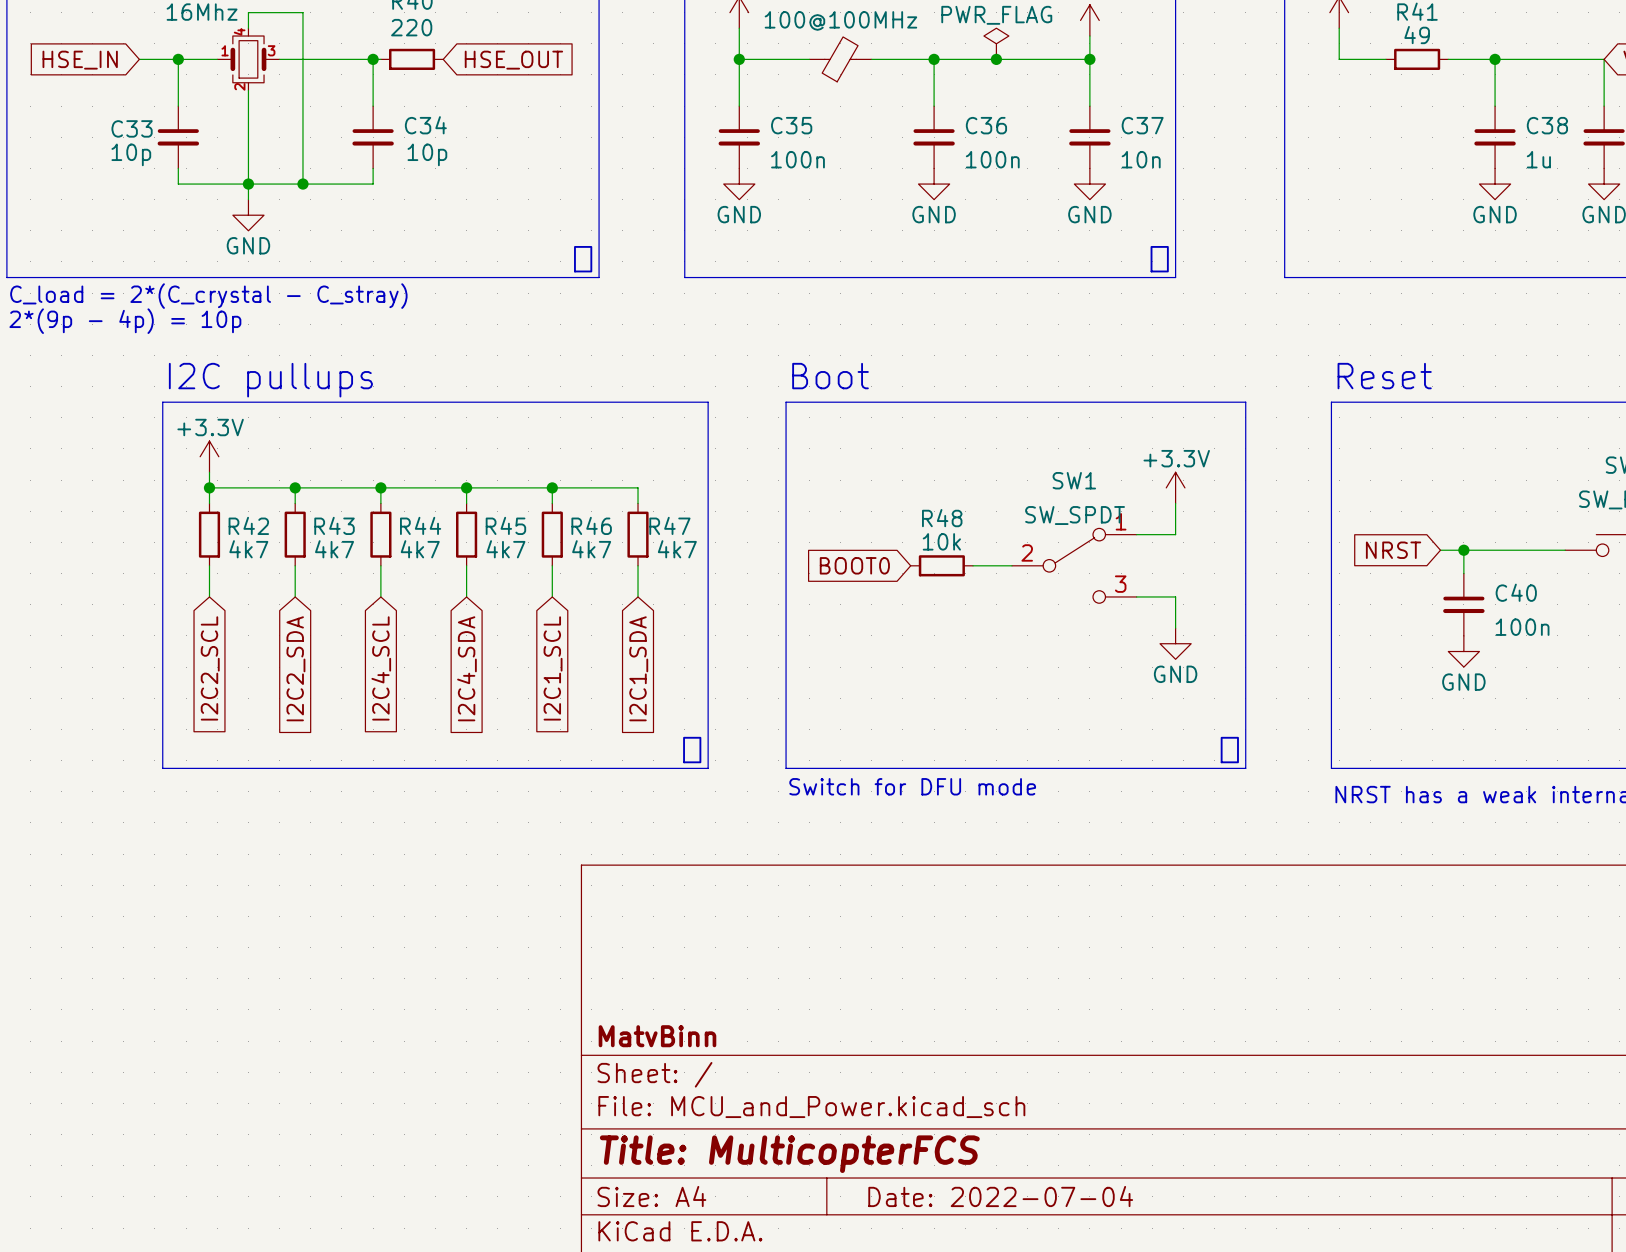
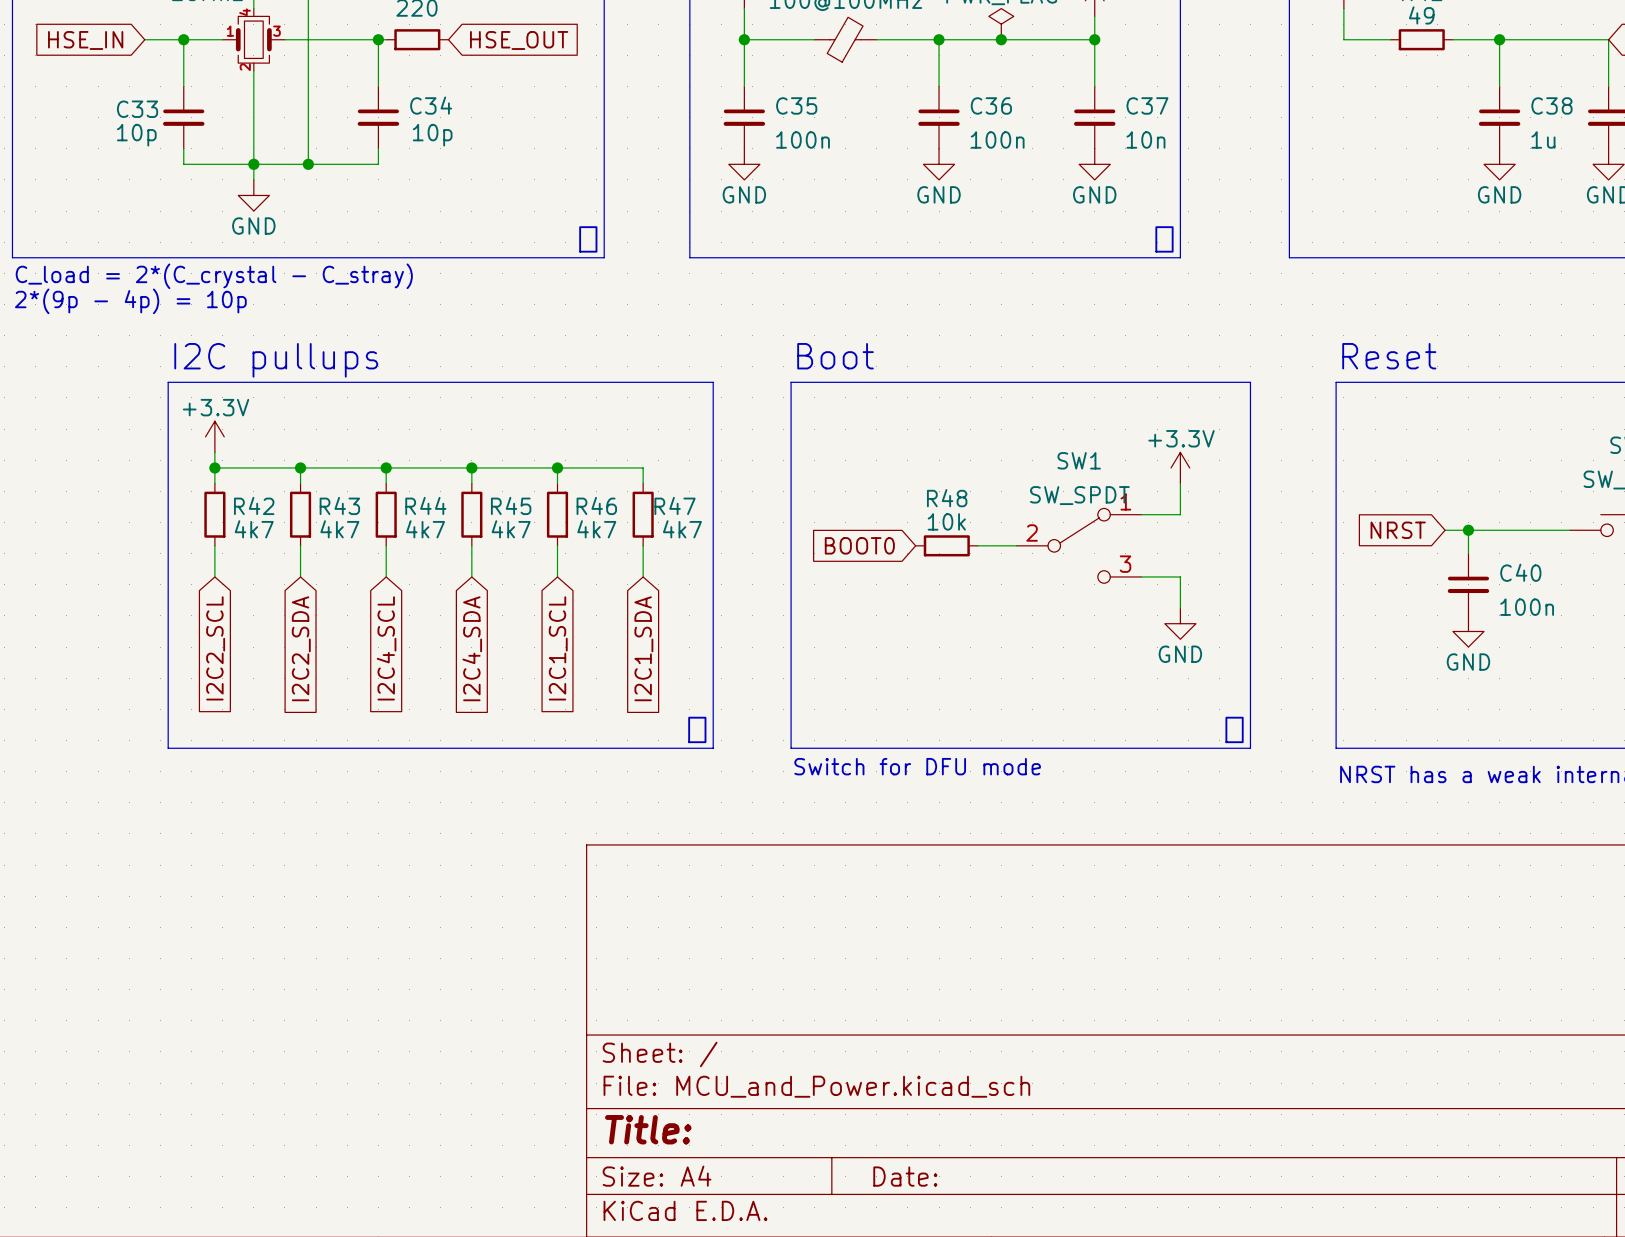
title block: MatvBinn (657, 1036) -> none
title block: Title: MulticopterFCS (789, 1154) -> Title: (648, 1129)
title block: Date: 2022-07-04 (1000, 1196) -> Date: (905, 1176)

